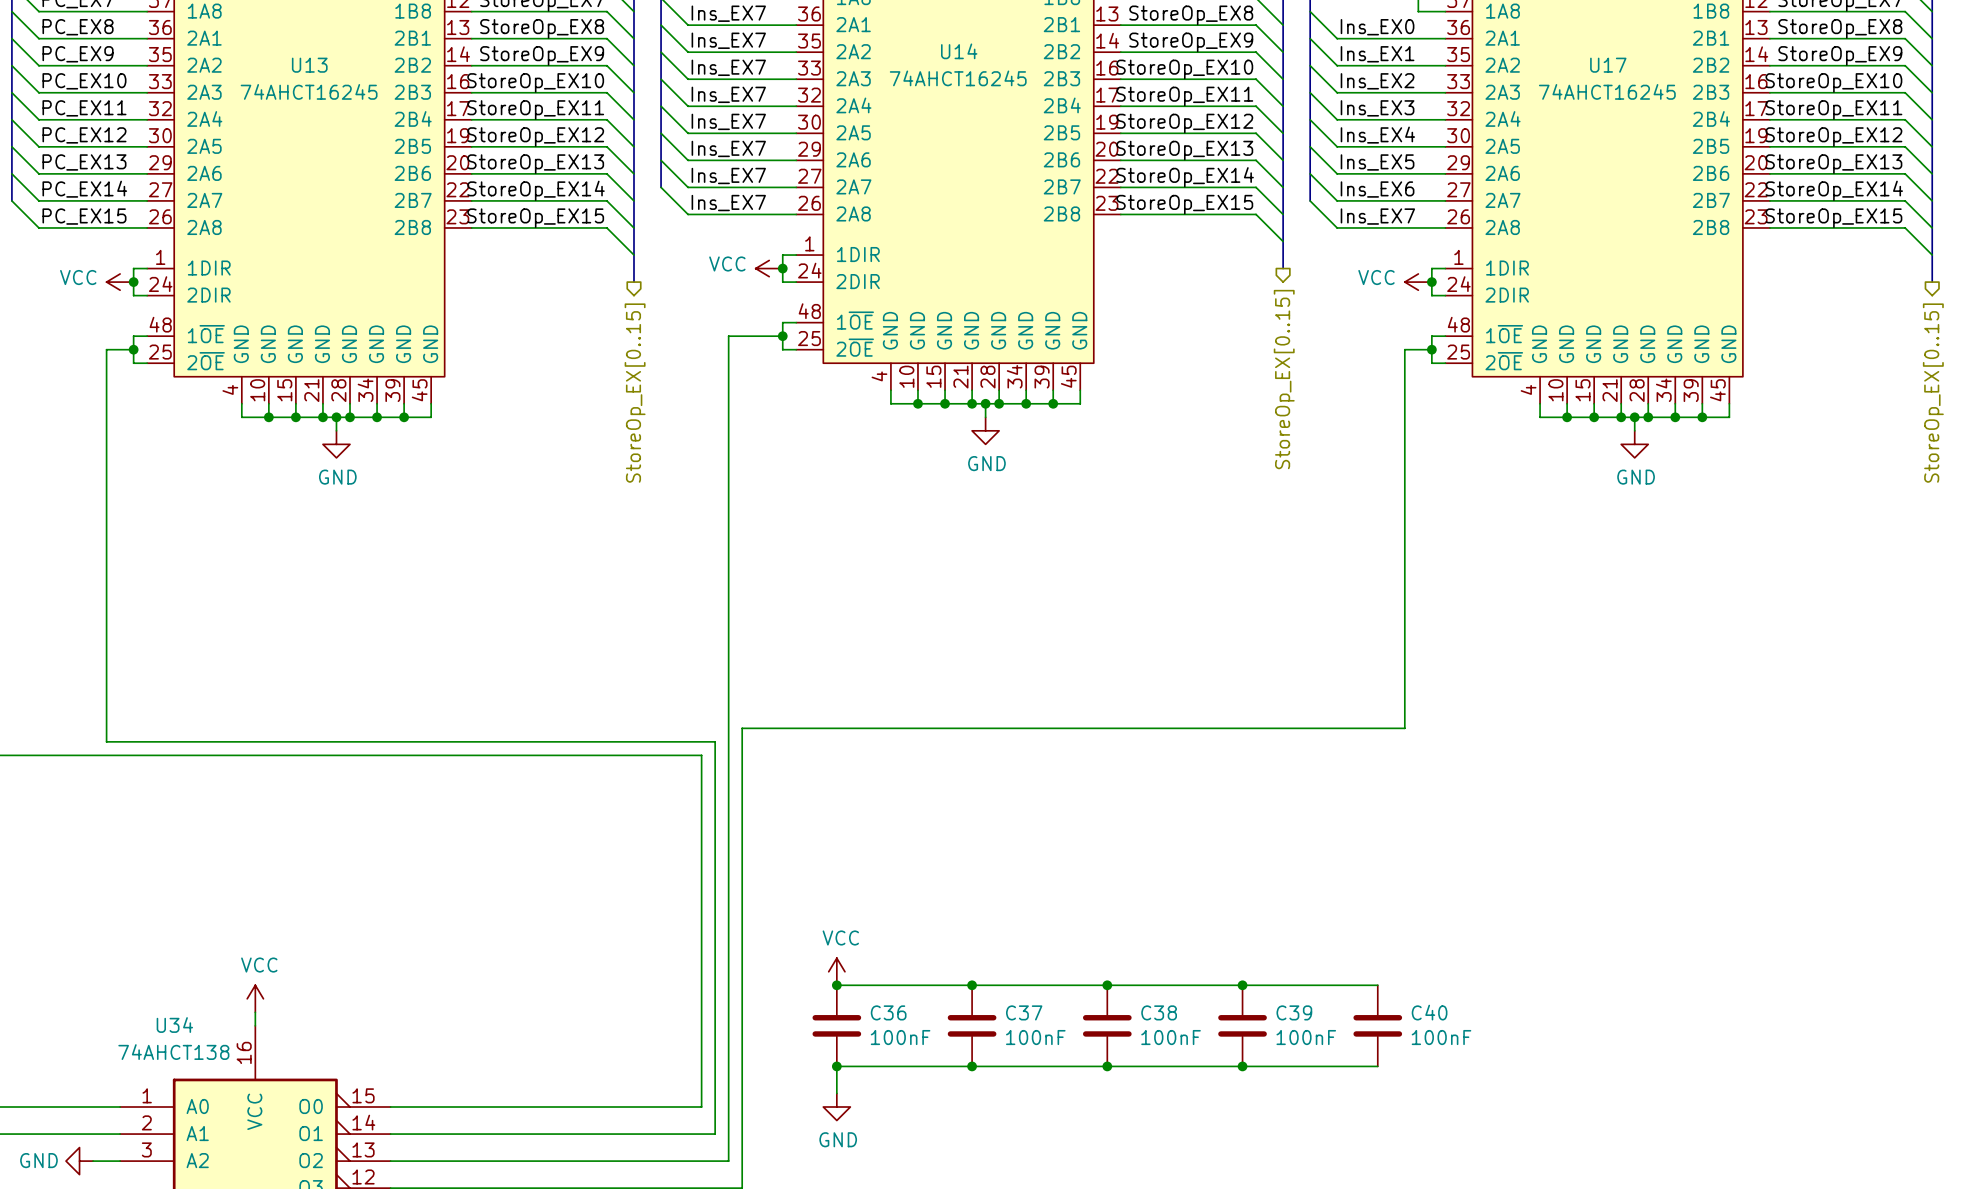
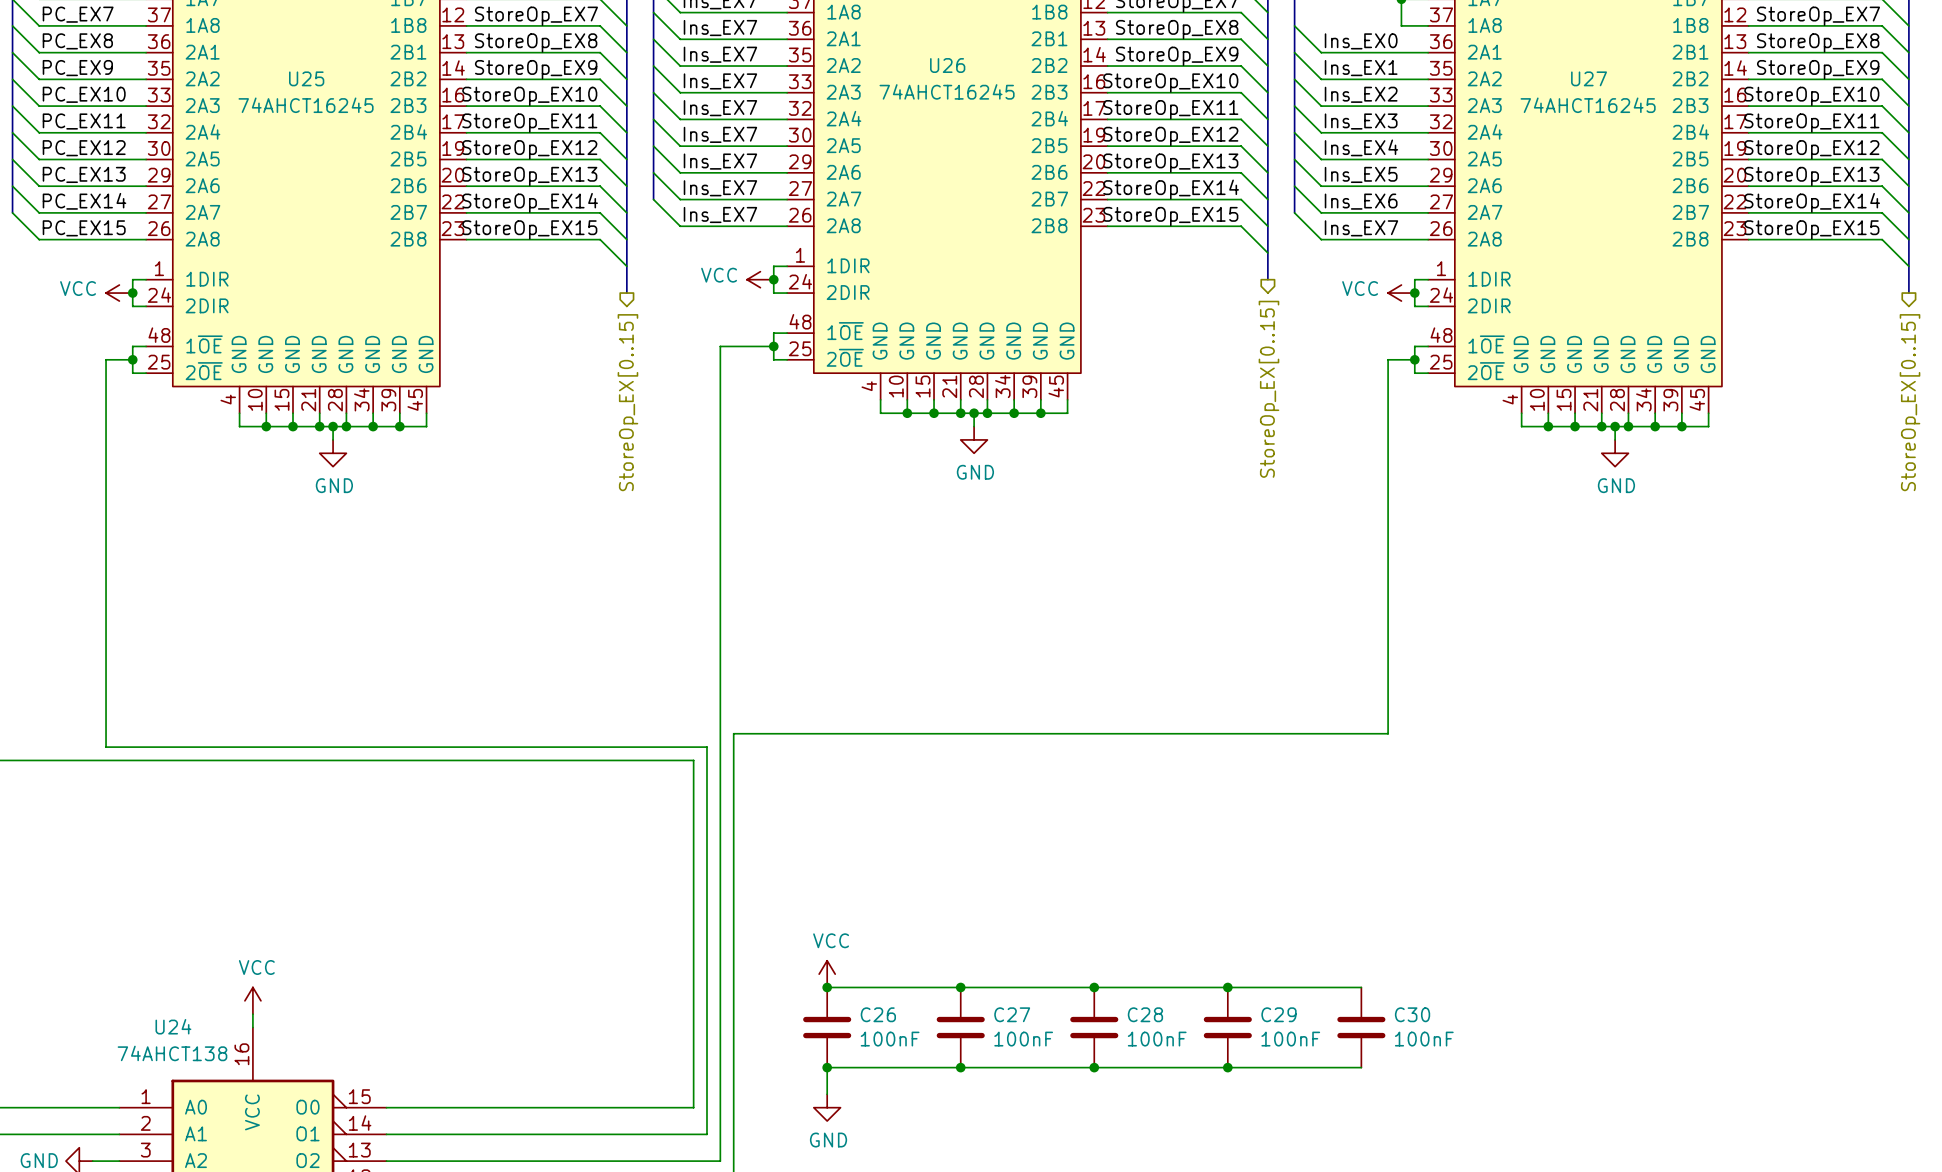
U14 name: U14 (959, 51) -> U26 (947, 65)
U13 name: U13 (309, 65) -> U25 (306, 78)
U17 name: U17 (1608, 65) -> U27 (1589, 78)
C36 name: C36 (888, 1012) -> C26 (878, 1014)
C37 name: C37 (1024, 1012) -> C27 (1012, 1014)
C38 name: C38 (1159, 1012) -> C28 (1145, 1014)
C39 name: C39 (1294, 1012) -> C29 (1278, 1014)
C40 name: C40 (1429, 1012) -> C30 (1412, 1014)
U34 name: U34 (174, 1025) -> U24 (173, 1026)

